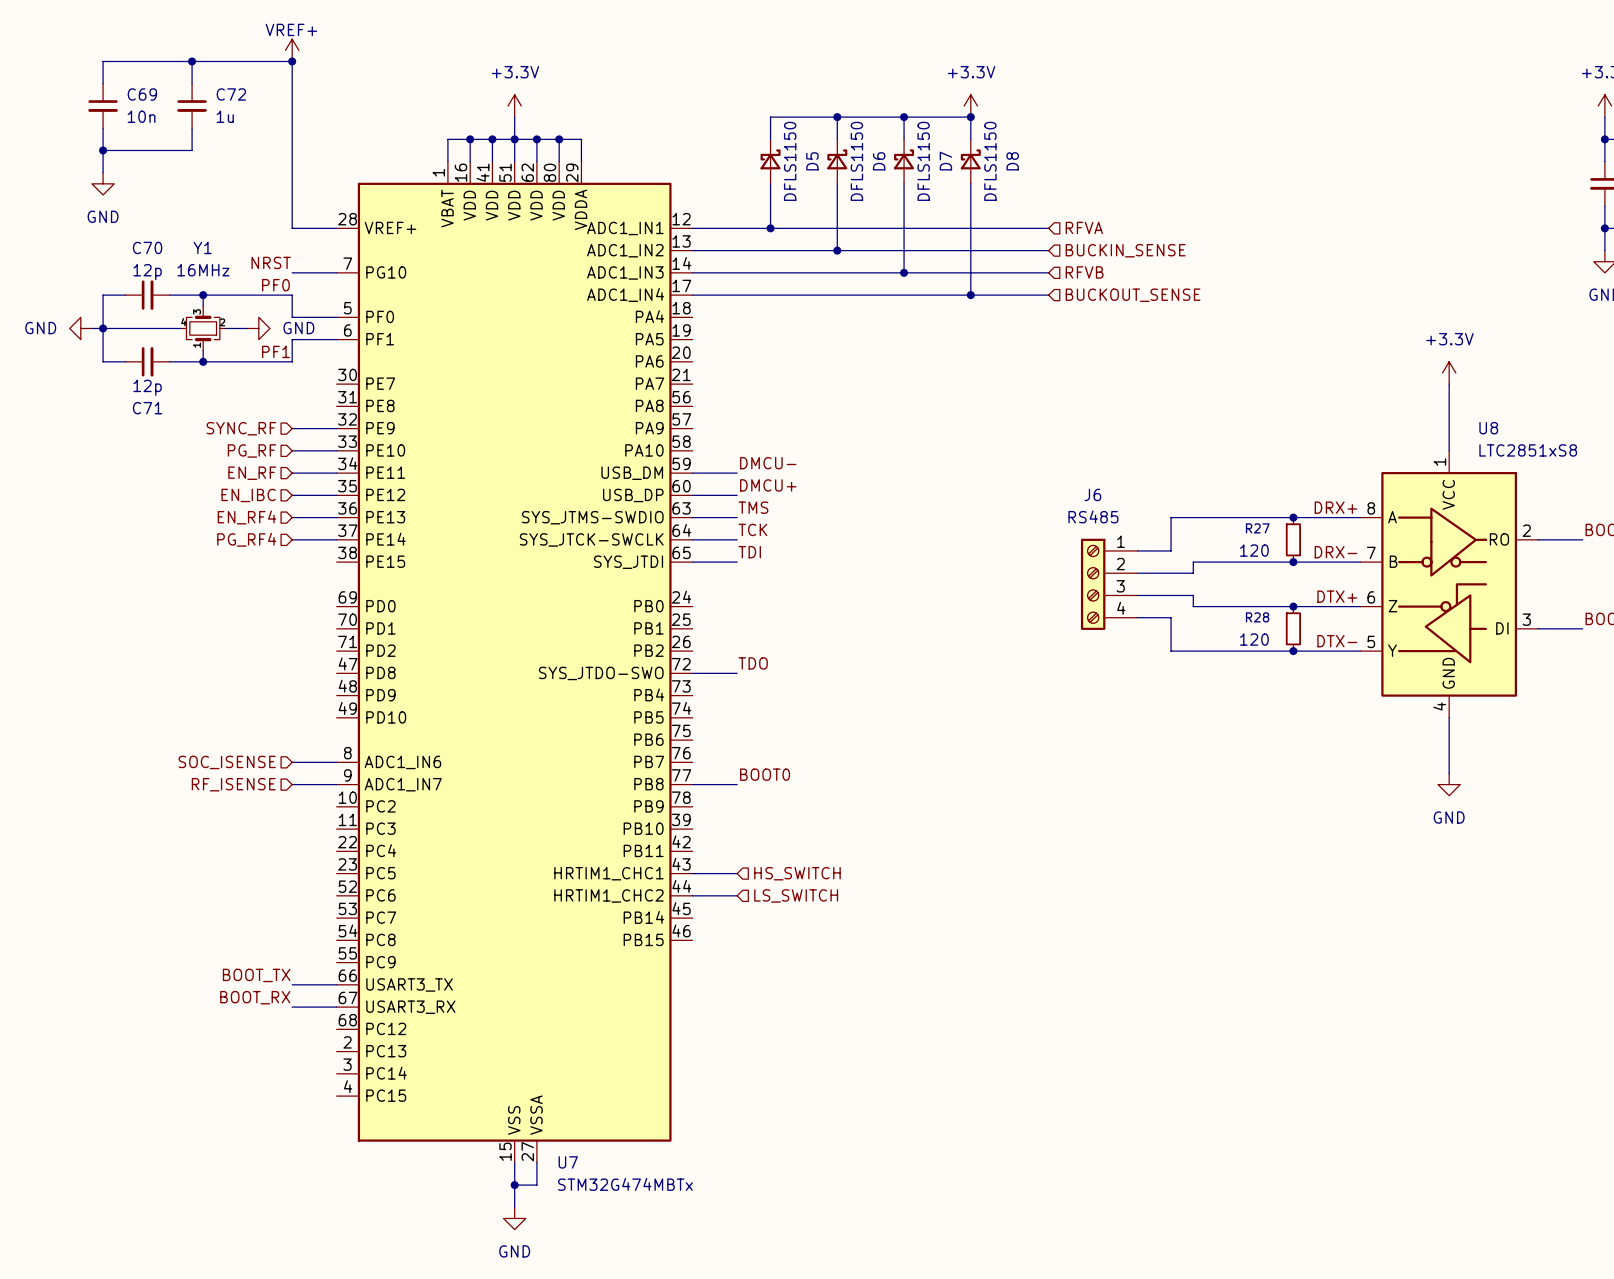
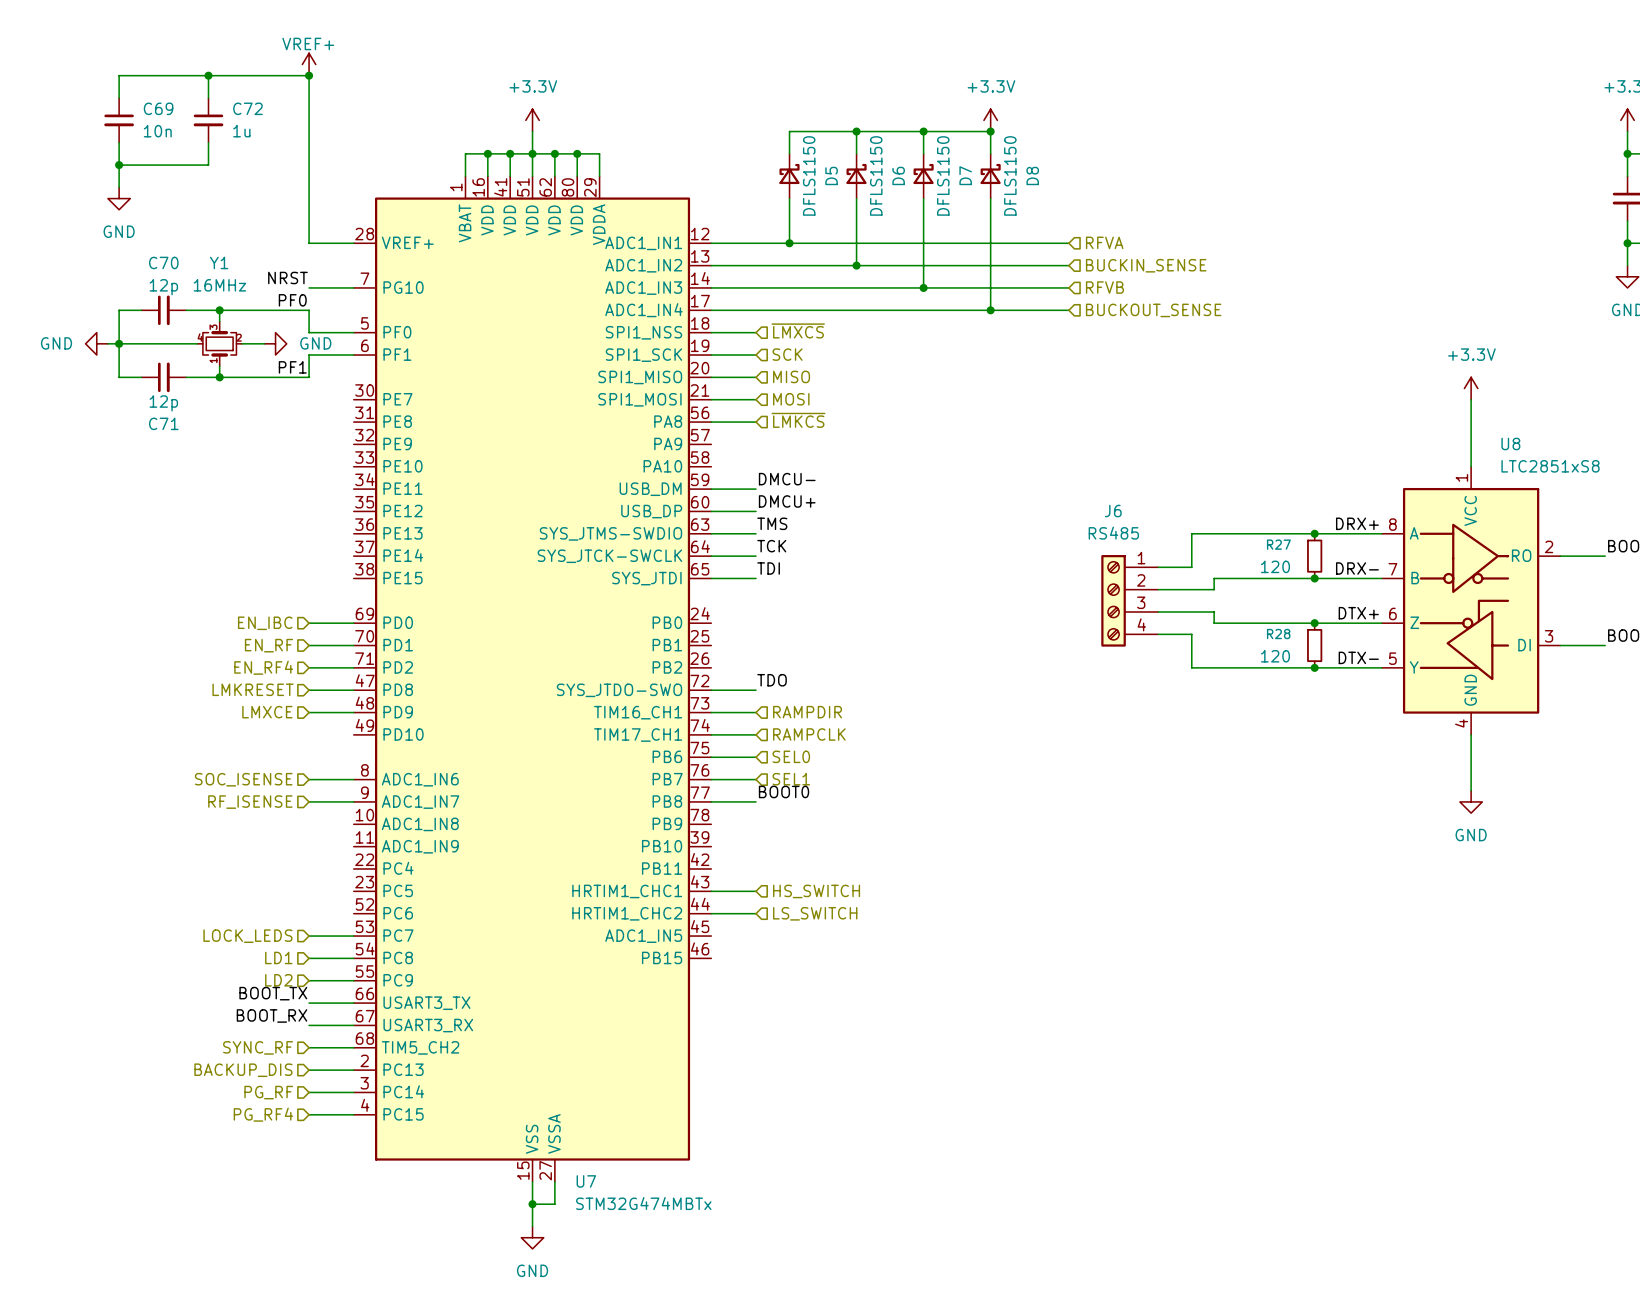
U7 symbol: [336, 161, 693, 1163] -> [353, 176, 712, 1182]
hierarchical label: none -> ~{LMXCS} (798, 330)
wire: none -> (711, 332) (756, 332)
wire: none -> (711, 355) (756, 355)
hierarchical label: none -> SCK (787, 354)
wire: none -> (711, 377) (756, 377)
hierarchical label: none -> MISO (791, 376)
hierarchical label: none -> MOSI (791, 399)
wire: none -> (711, 399) (756, 399)
hierarchical label: none -> ~{LMKCS} (798, 420)
wire: none -> (711, 422) (756, 422)
hierarchical label: SYNC_RF (241, 428) -> none
wire: (292, 428) (336, 428) -> none
hierarchical label: PG_RF (252, 450) -> none
wire: (292, 450) (336, 450) -> (309, 623) (353, 623)
hierarchical label position: EN_RF (252, 473) -> EN_RF (268, 645)
wire: (292, 473) (336, 473) -> (309, 645) (353, 645)
hierarchical label position: EN_IBC (248, 495) -> EN_IBC (265, 623)
wire: (292, 495) (336, 495) -> (309, 667) (353, 667)
hierarchical label position: EN_RF4 (246, 517) -> EN_RF4 (263, 667)
wire: (292, 517) (336, 517) -> (309, 690) (353, 690)
hierarchical label: PG_RF4 (246, 539) -> none
wire: (292, 539) (336, 539) -> (309, 712) (353, 712)
hierarchical label: none -> LMKRESET (253, 689)
hierarchical label: none -> LMXCE (267, 712)
wire: none -> (711, 712) (756, 712)
hierarchical label: none -> RAMPDIR (807, 712)
wire: none -> (711, 734) (756, 734)
hierarchical label: none -> RAMPCLK (809, 734)
hierarchical label: none -> SEL0 (791, 756)
wire: none -> (711, 757) (756, 757)
hierarchical label: none -> SEL1 (791, 779)
wire: none -> (711, 779) (756, 779)
hierarchical label: none -> LOCK_LEDS (247, 936)
wire: none -> (309, 936) (353, 936)
hierarchical label: none -> LD1 (278, 957)
wire: none -> (309, 958) (353, 958)
hierarchical label: none -> LD2 (278, 980)
wire: none -> (309, 980) (353, 980)
hierarchical label: none -> SYNC_RF (258, 1047)
wire: none -> (309, 1047) (353, 1047)
hierarchical label: none -> BACKUP_DIS (243, 1070)
wire: none -> (309, 1070) (353, 1070)
hierarchical label: none -> PG_RF (268, 1092)
wire: none -> (309, 1092) (353, 1092)
hierarchical label: none -> PG_RF4 (263, 1114)
wire: none -> (309, 1114) (353, 1114)

